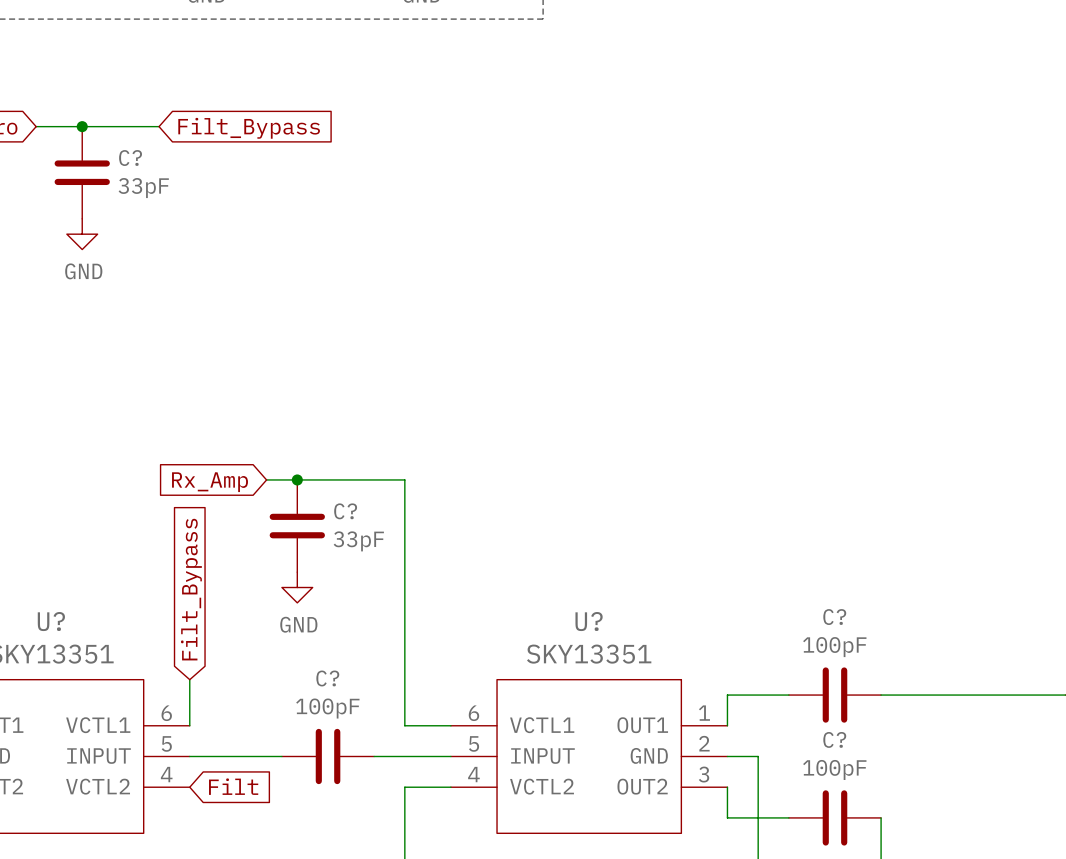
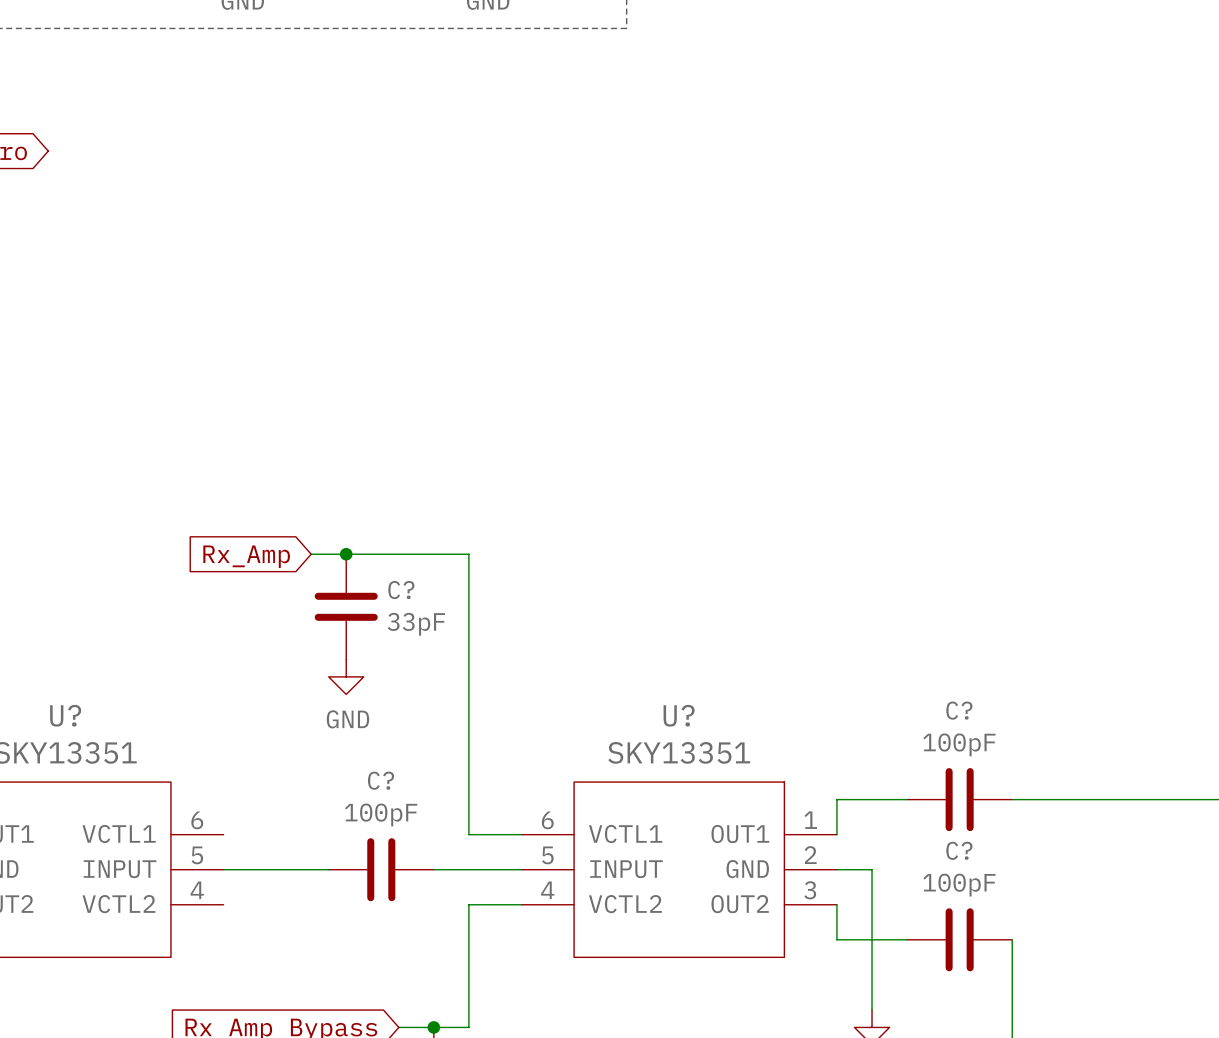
wire: (36, 126) (159, 126) -> none
junction: (82, 126) -> none
global label: Filt_Bypass (249, 128) -> none
C?: 33pF (82, 172) -> none
power symbol: GND (82, 234) -> none
global label: Filt_Bypass (191, 589) -> none
wire: (189, 679) (189, 725) -> none
global label: Filt (233, 786) -> none

